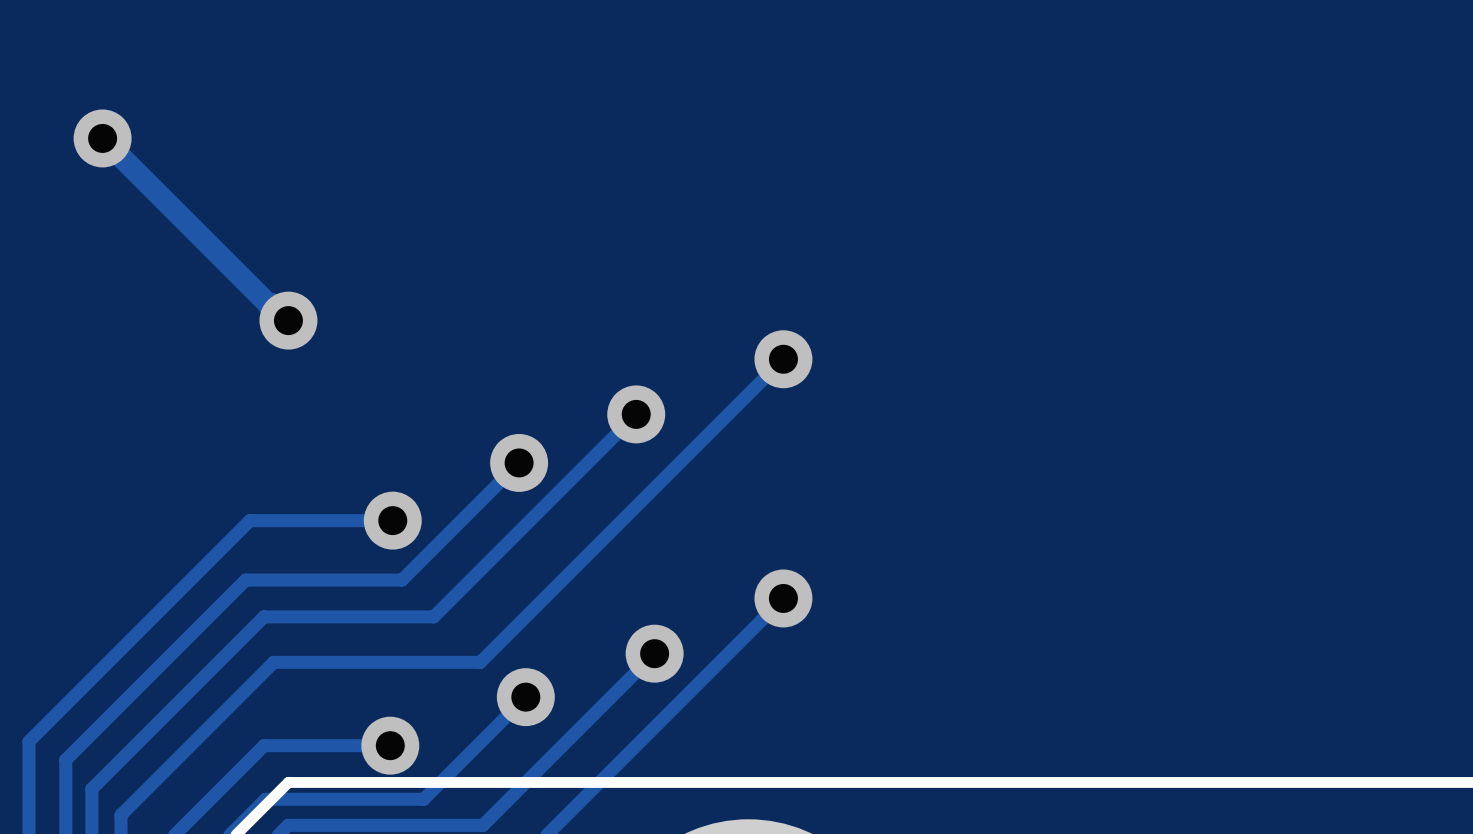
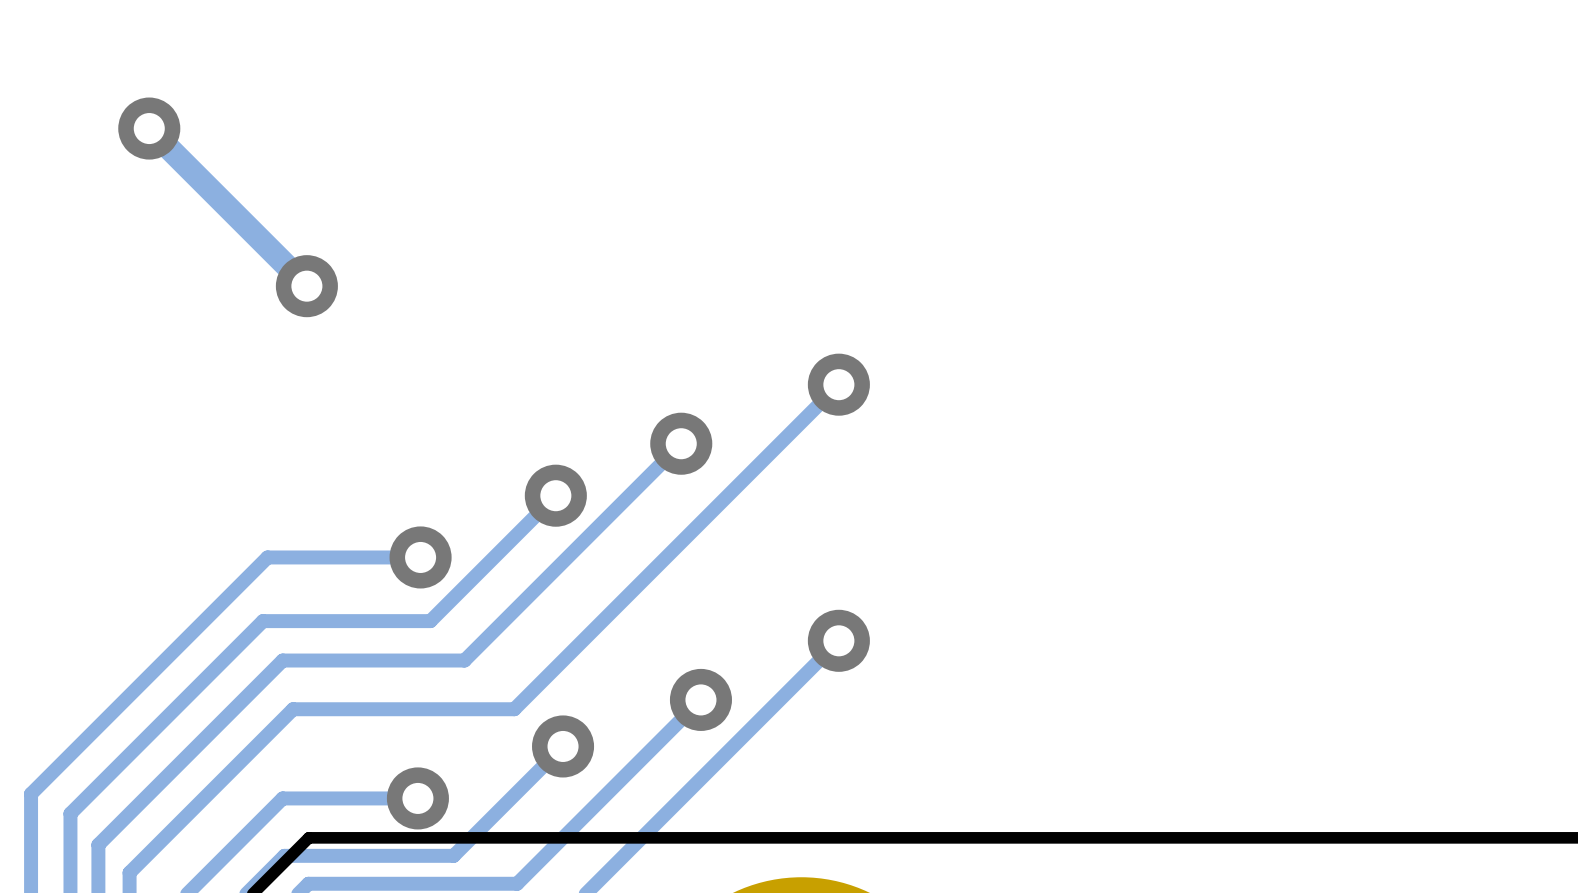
track: none -> (149, 128) (306, 286)
track: (102, 138) (268, 304) (271, 304) (288, 320) -> none
via position: (102, 138) -> (149, 128)
via position: (288, 320) -> (306, 286)

